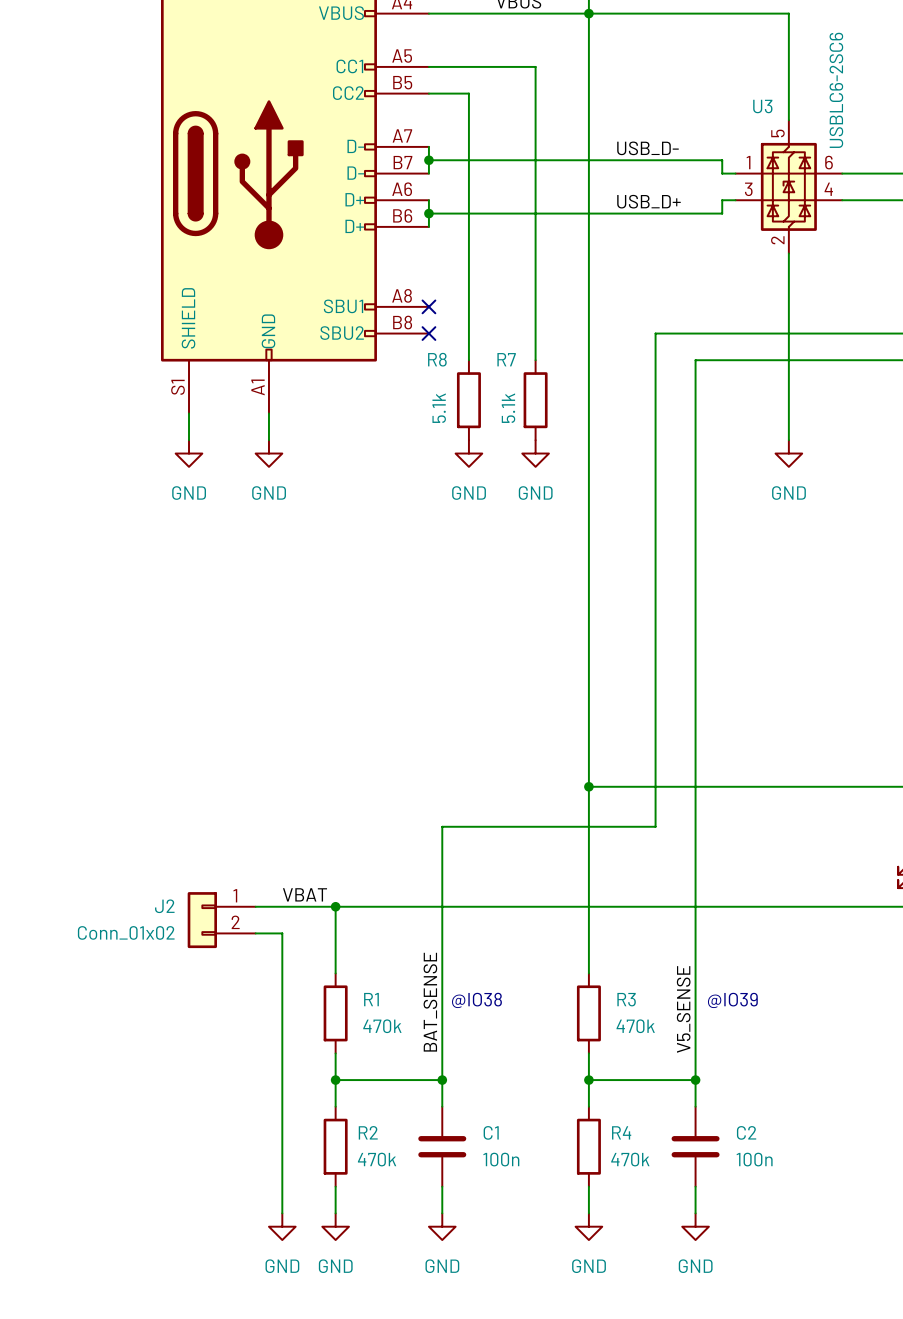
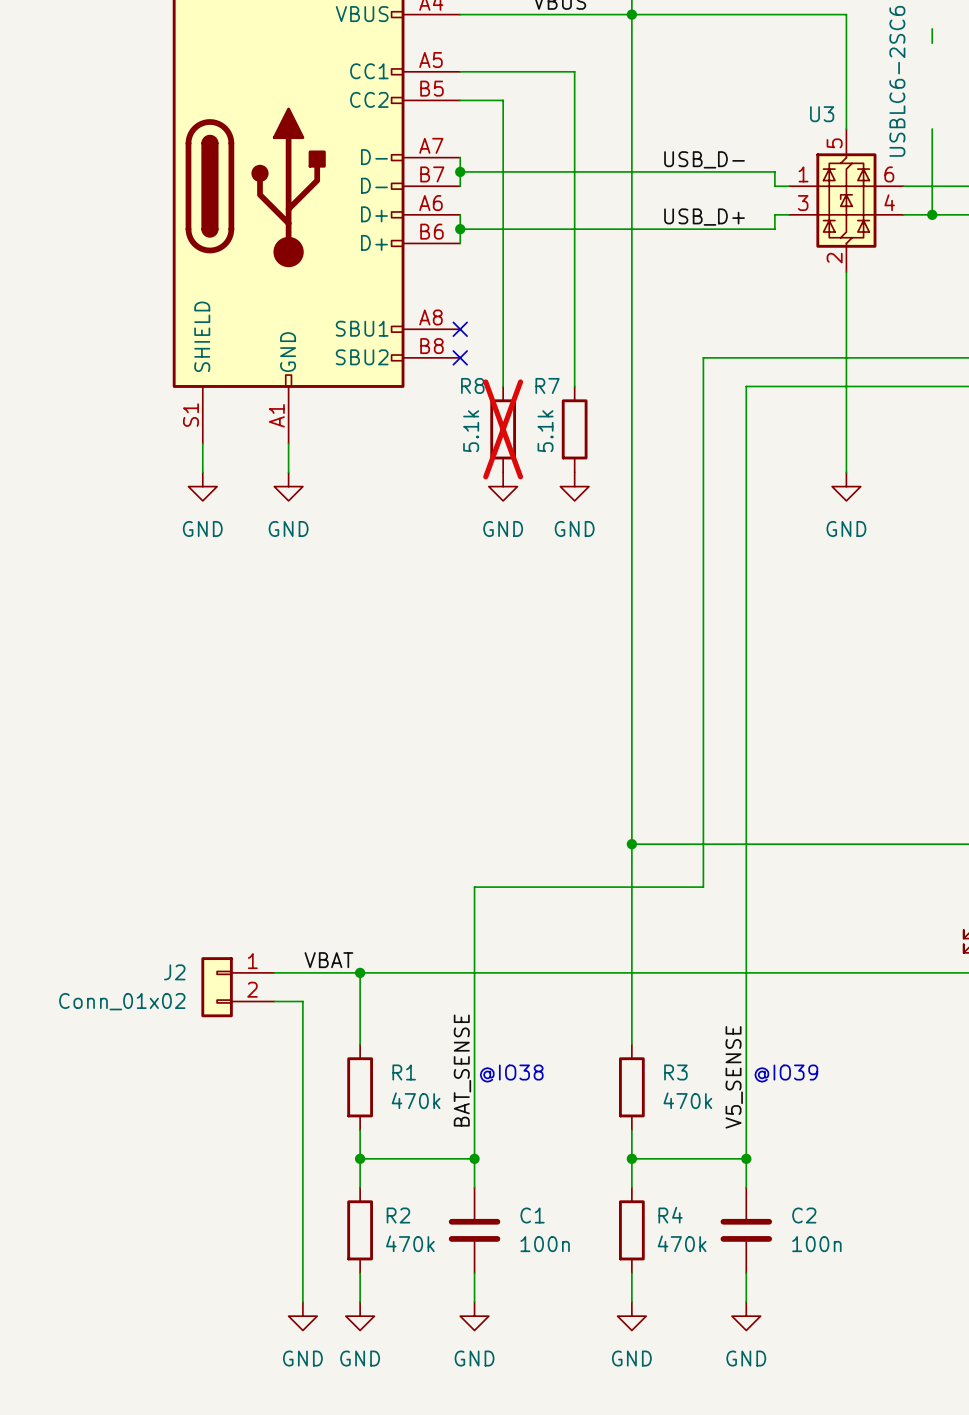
wire: none -> (932, 28) (932, 43)
wire: none -> (932, 129) (932, 214)
junction: none -> (932, 214)
R8 do-not-place cross: none -> (503, 429)

